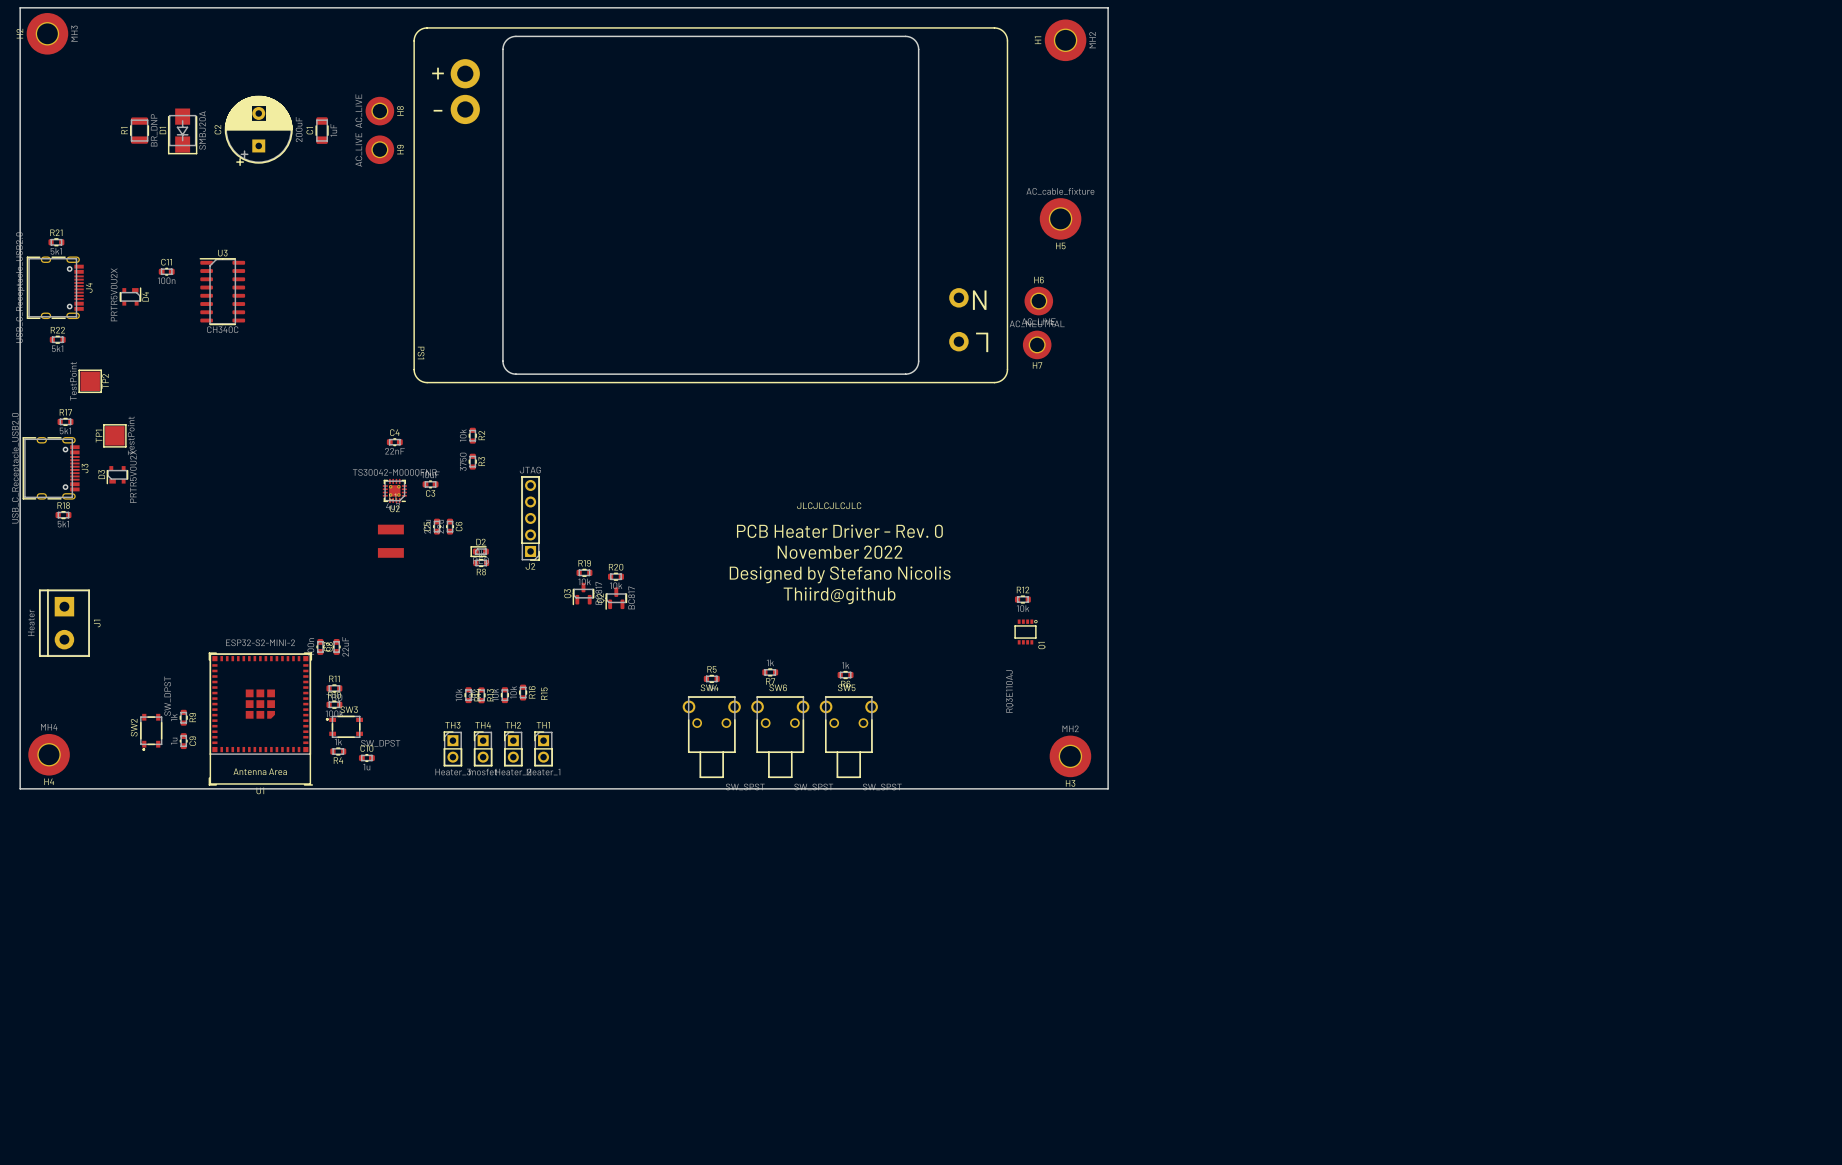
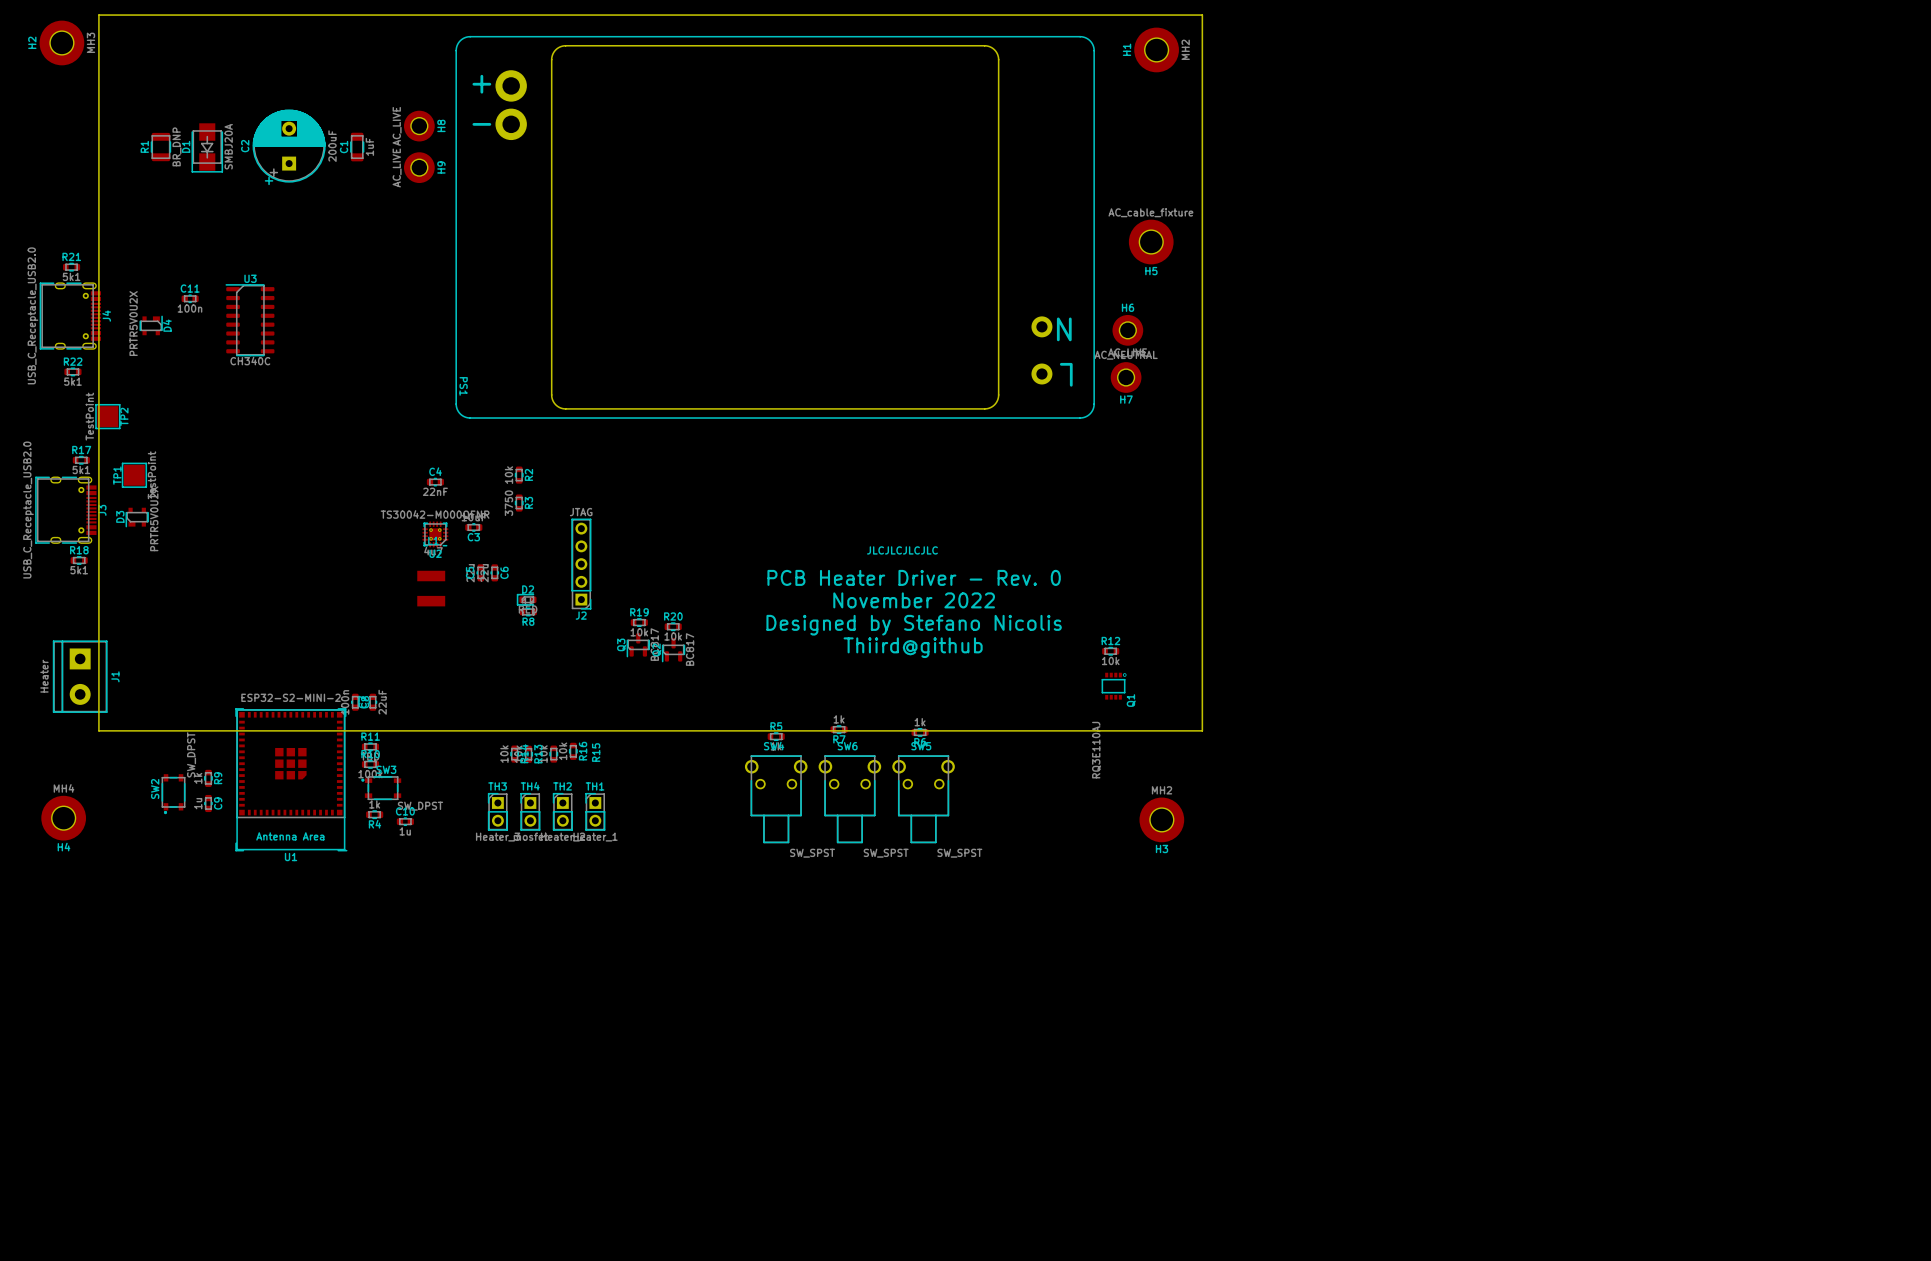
board edge: (81, 7) (20, 7) (20, 788) (1108, 788) (1108, 673) -> (98, 15) (98, 730) (1202, 730)

